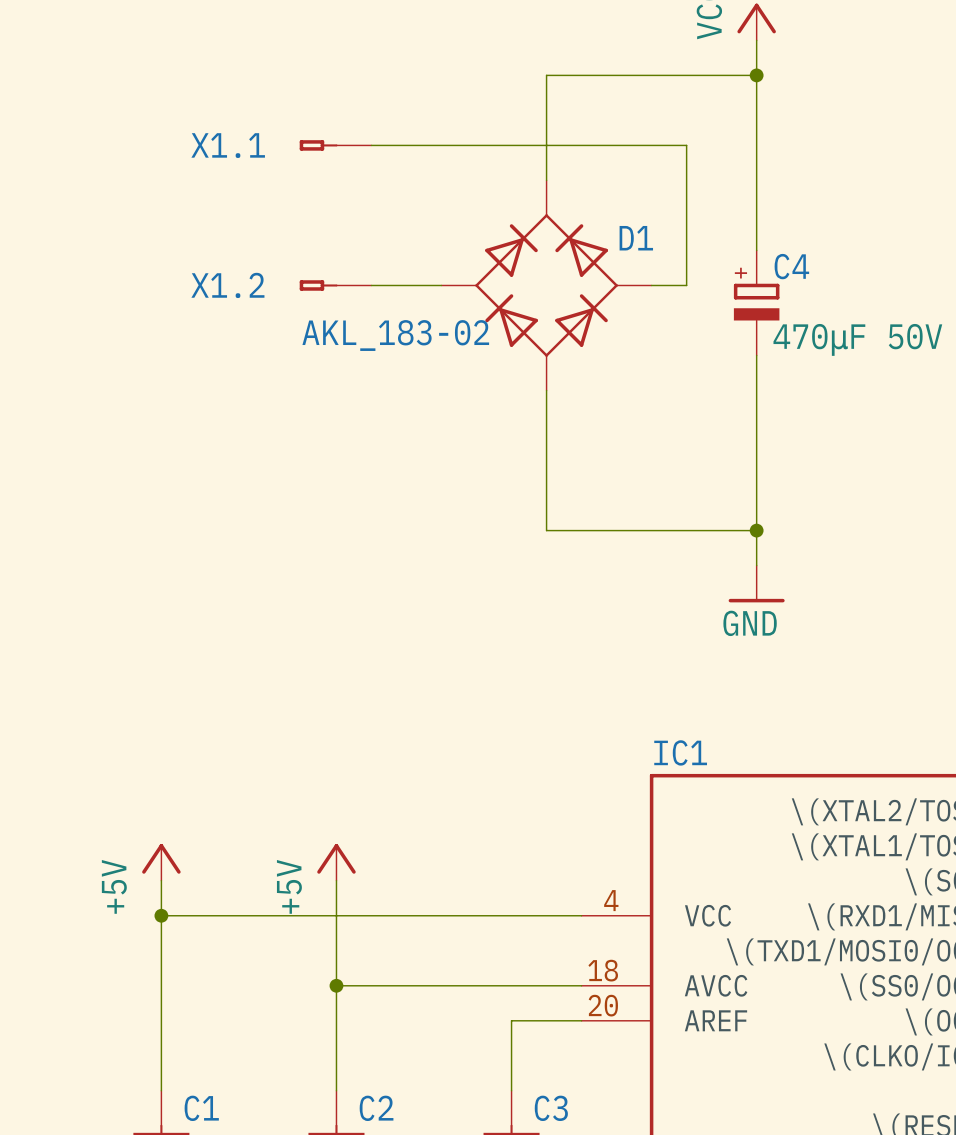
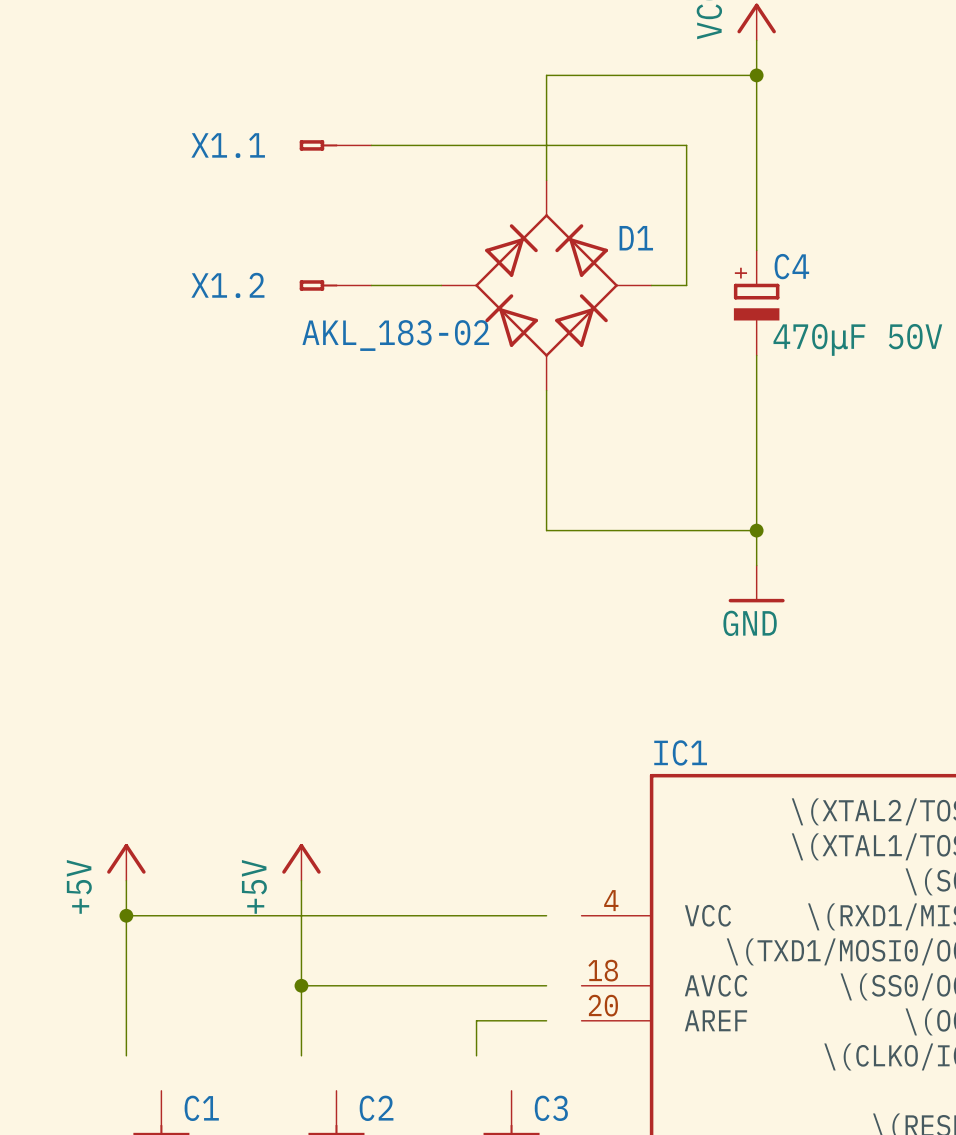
power symbol position: +5V (161, 862) -> +5V (126, 862)
power symbol position: +5V (336, 862) -> +5V (301, 862)
wire: none -> (126, 880) (126, 1055)
wire: (161, 880) (161, 1090) -> none
wire: none -> (301, 880) (301, 1055)
wire: (336, 880) (336, 1090) -> none
wire: none -> (126, 915) (161, 915)
junction position: (161, 915) -> (126, 915)
wire: (546, 915) (581, 915) -> none
junction position: (336, 985) -> (301, 985)
wire: (546, 985) (581, 985) -> (301, 985) (336, 985)
wire: (511, 1020) (511, 1090) -> (511, 1020) (476, 1020) (476, 1055)
wire: (546, 1020) (581, 1020) -> none

